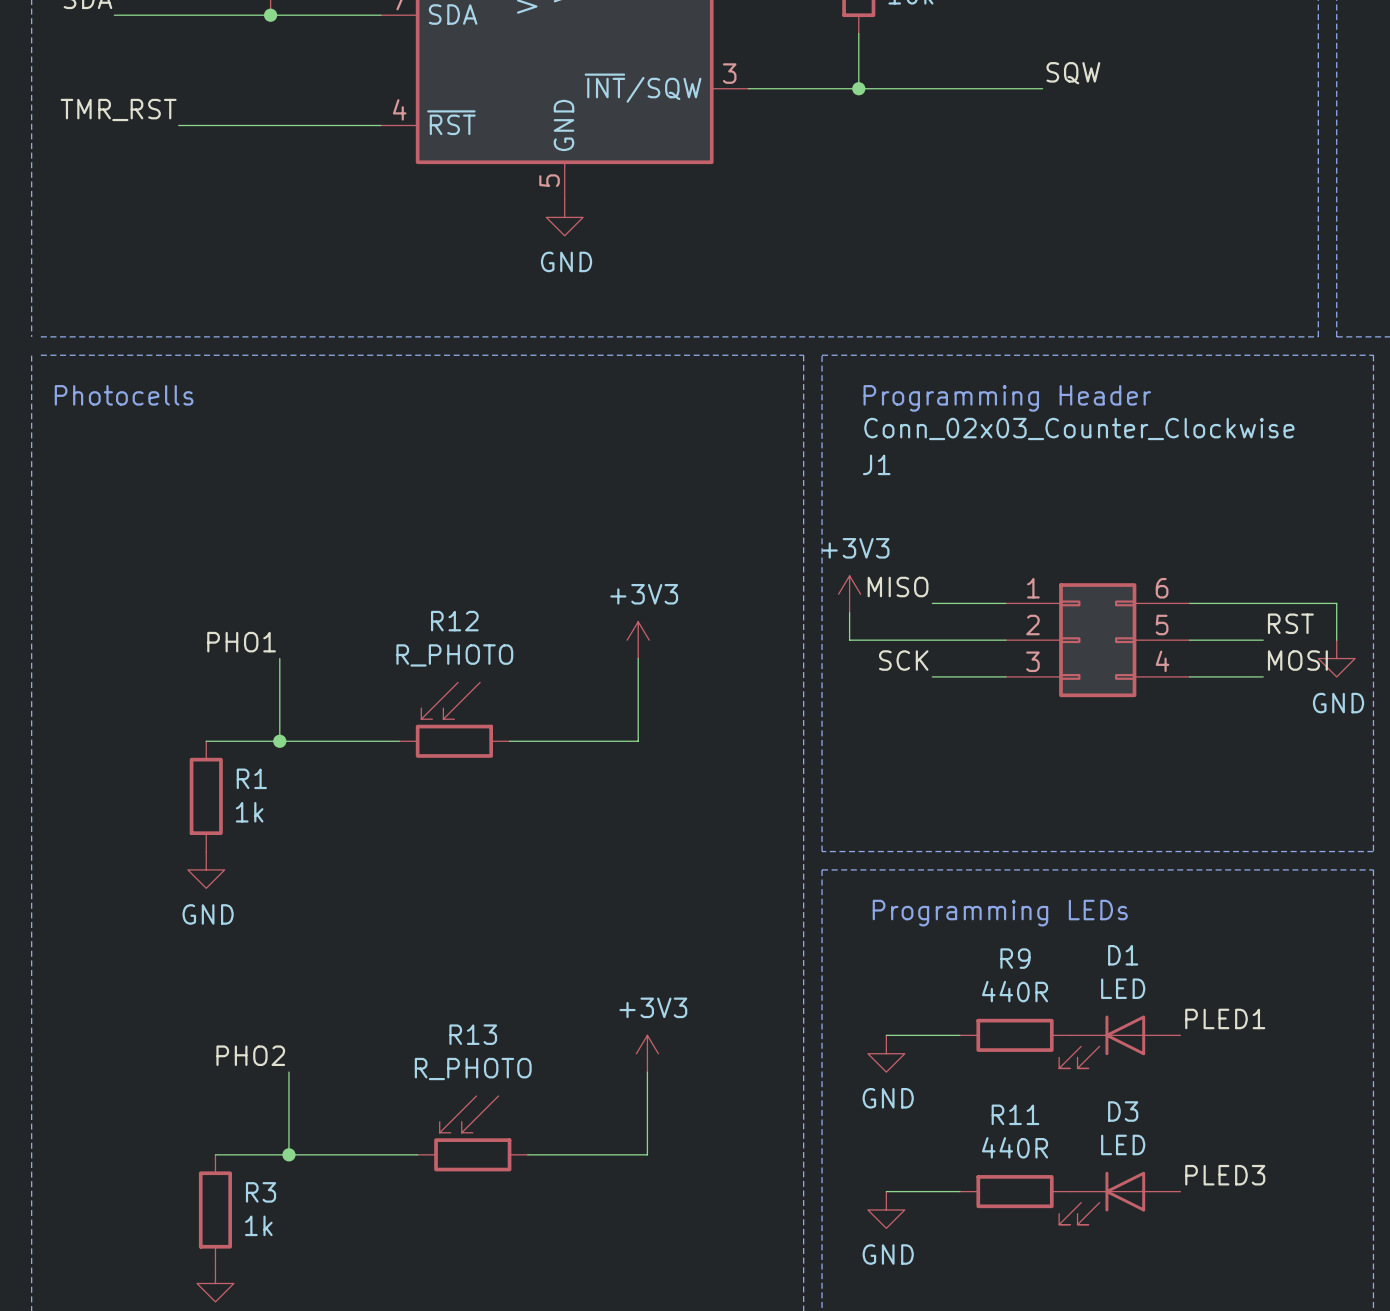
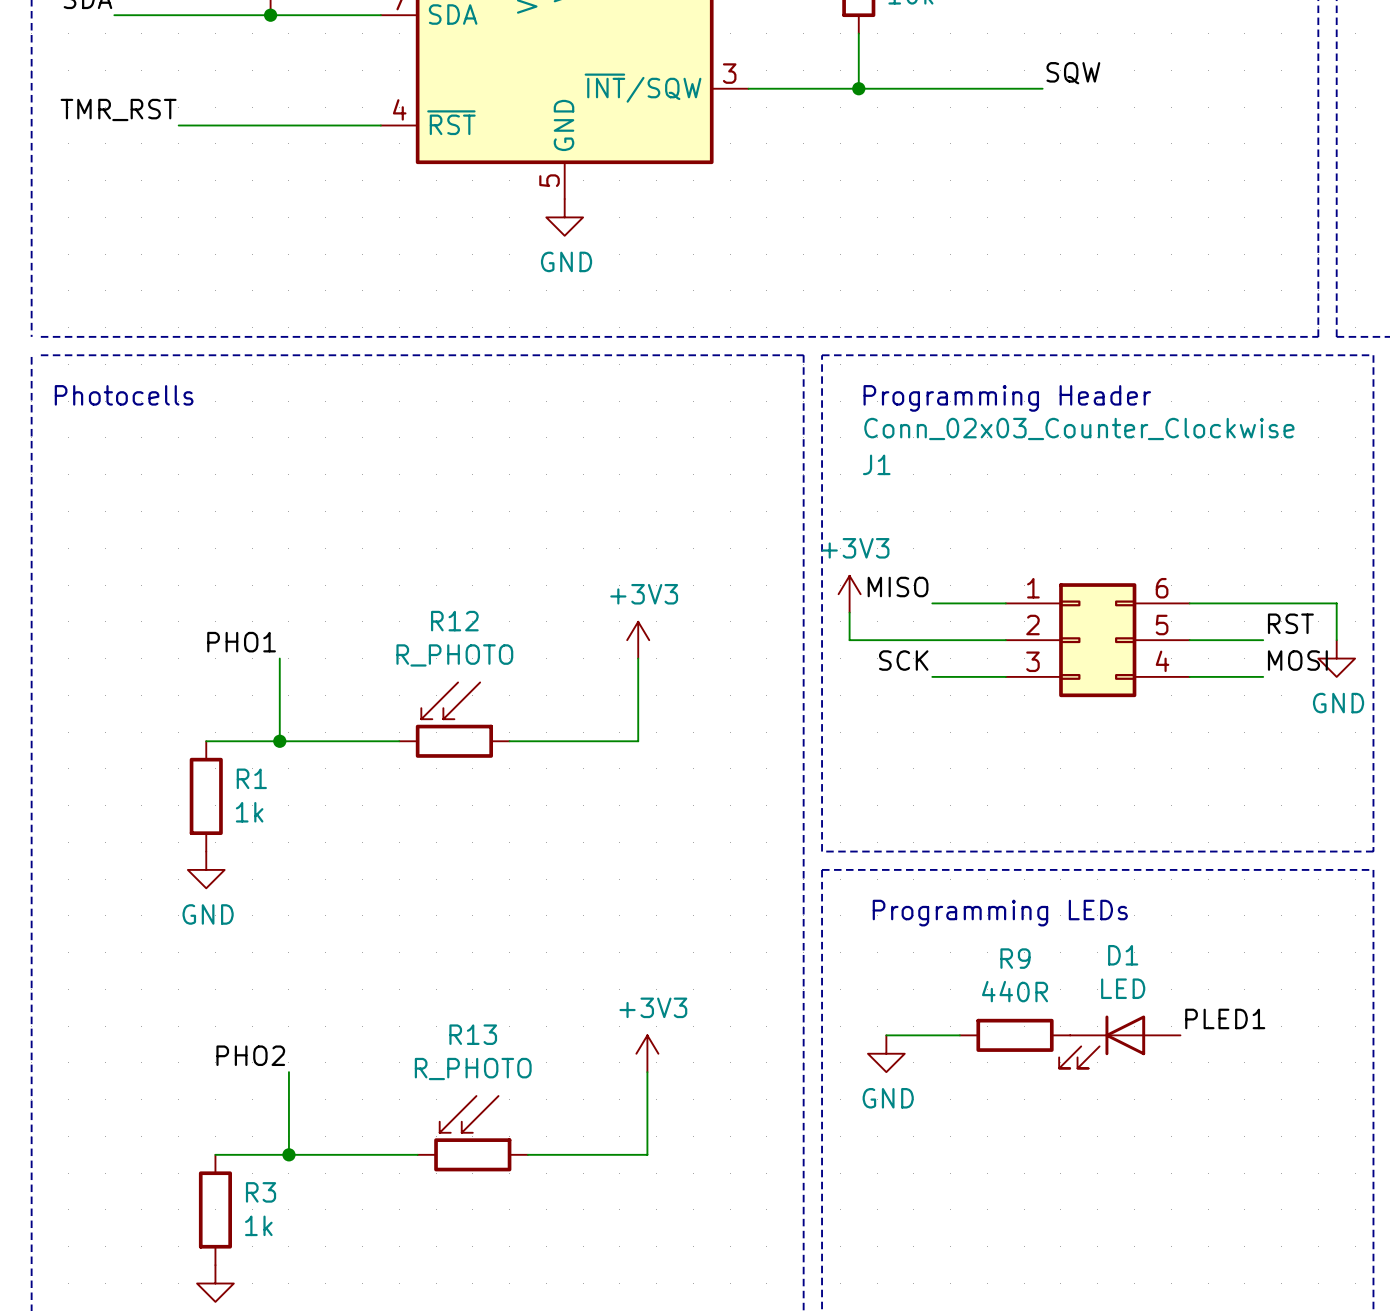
label: PLED3 (1225, 1175) -> none
wire: (886, 1191) (959, 1191) -> none
R11: 440R (1015, 1191) -> none
D3: LED (1119, 1198) -> none
power symbol: GND (886, 1209) -> none

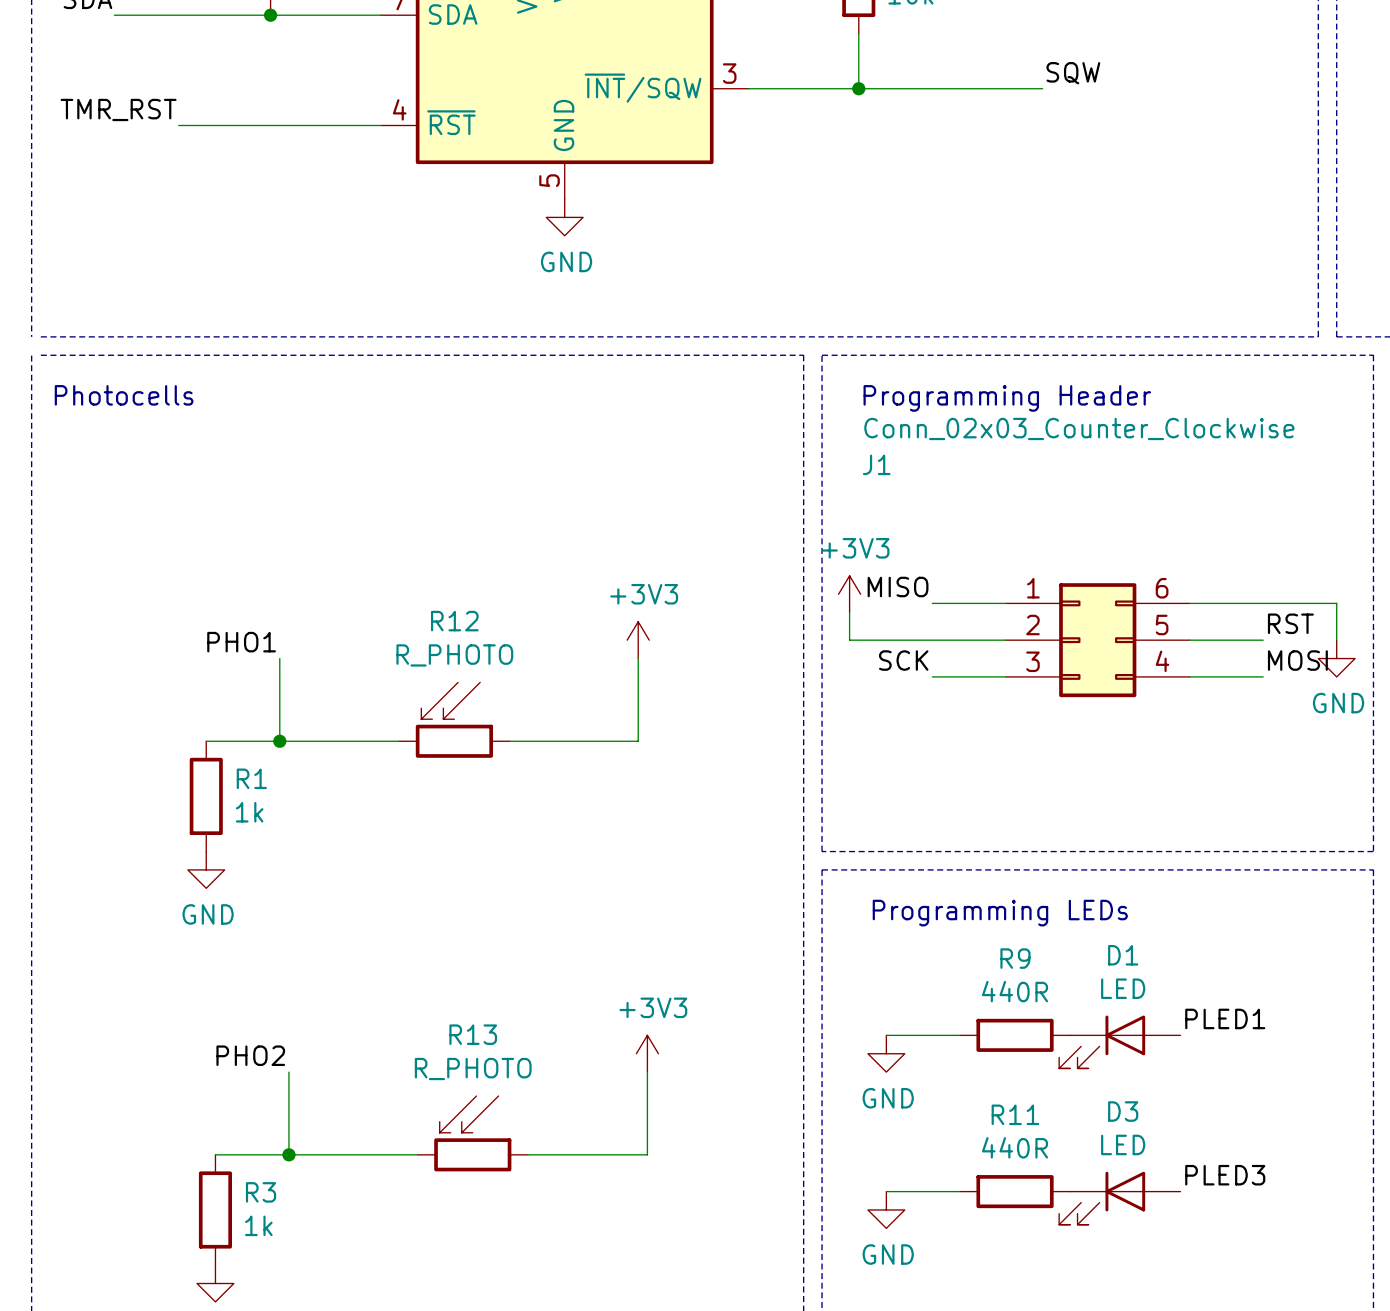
label: none -> PLED3 (1225, 1175)
wire: none -> (886, 1191) (959, 1191)
R11: none -> 440R (1015, 1191)
D3: none -> LED (1119, 1198)
power symbol: none -> GND (886, 1209)

